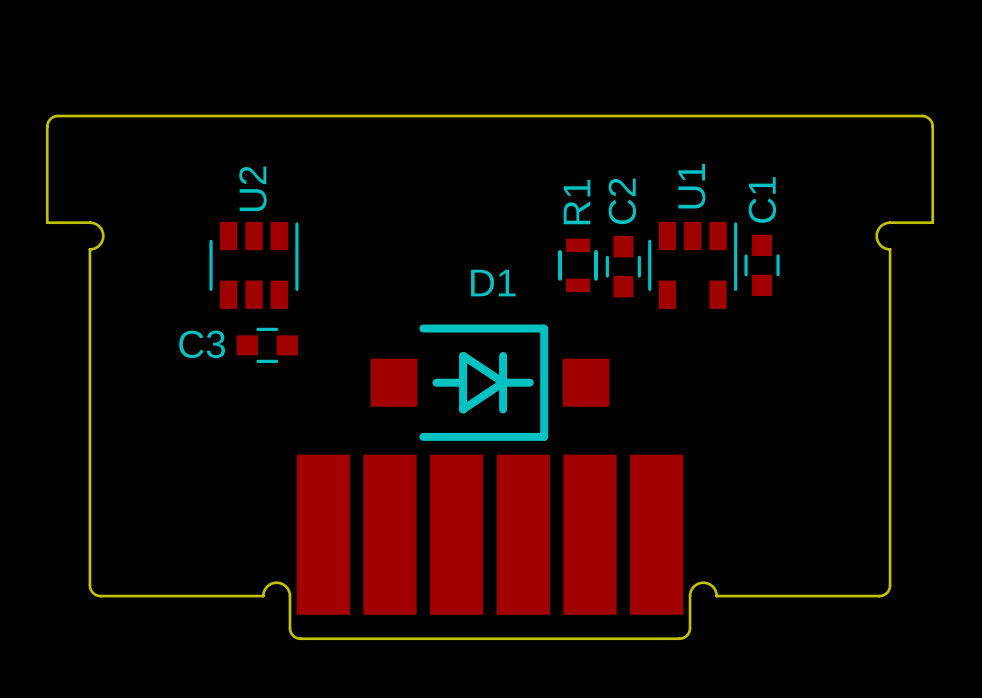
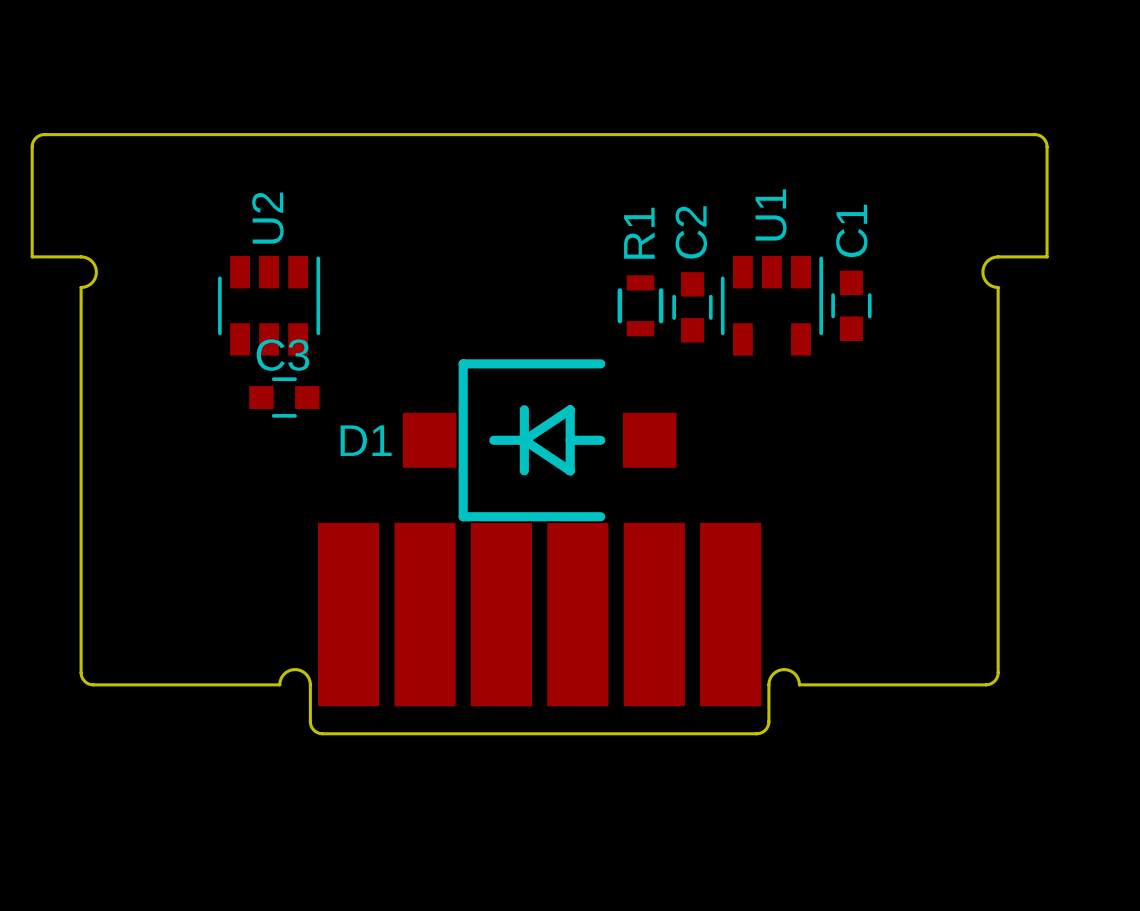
D1 name position: D1 (493, 283) -> D1 (366, 440)
D1 footprint: [370, 324, 610, 441] -> [402, 359, 677, 522]
C3 name position: C3 (202, 344) -> C3 (283, 355)

